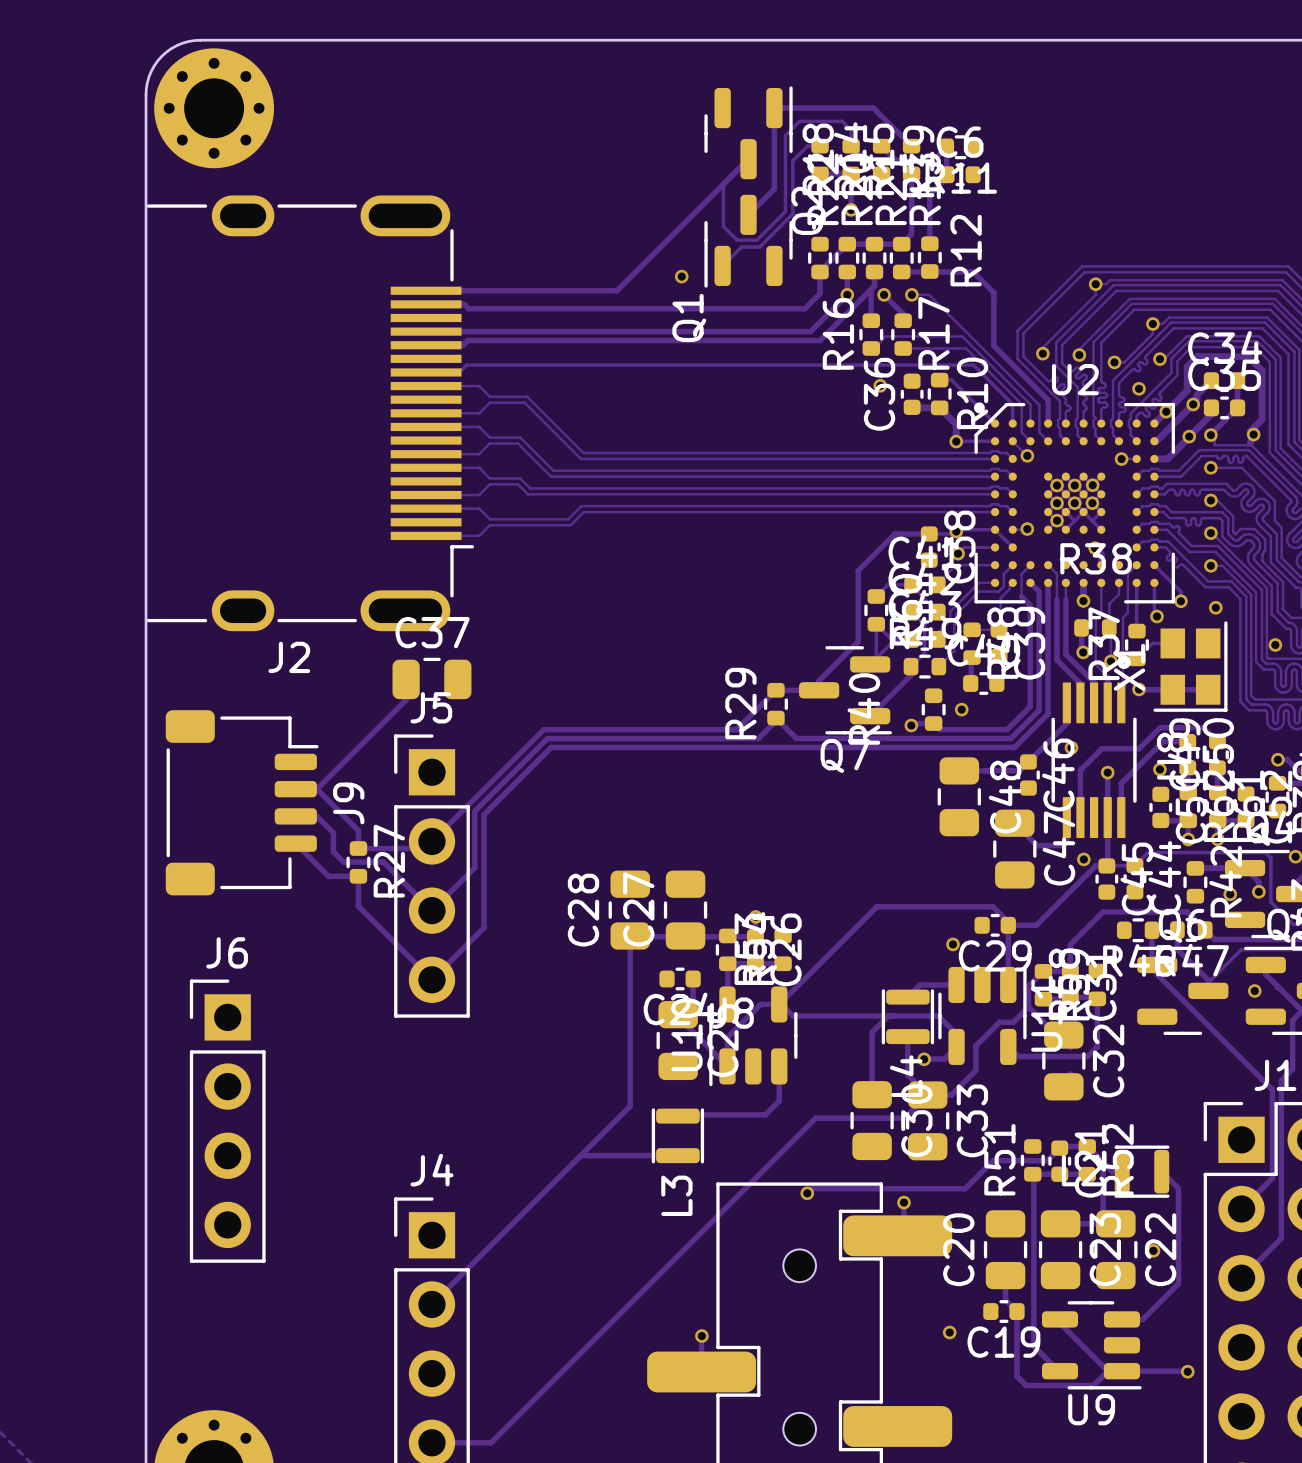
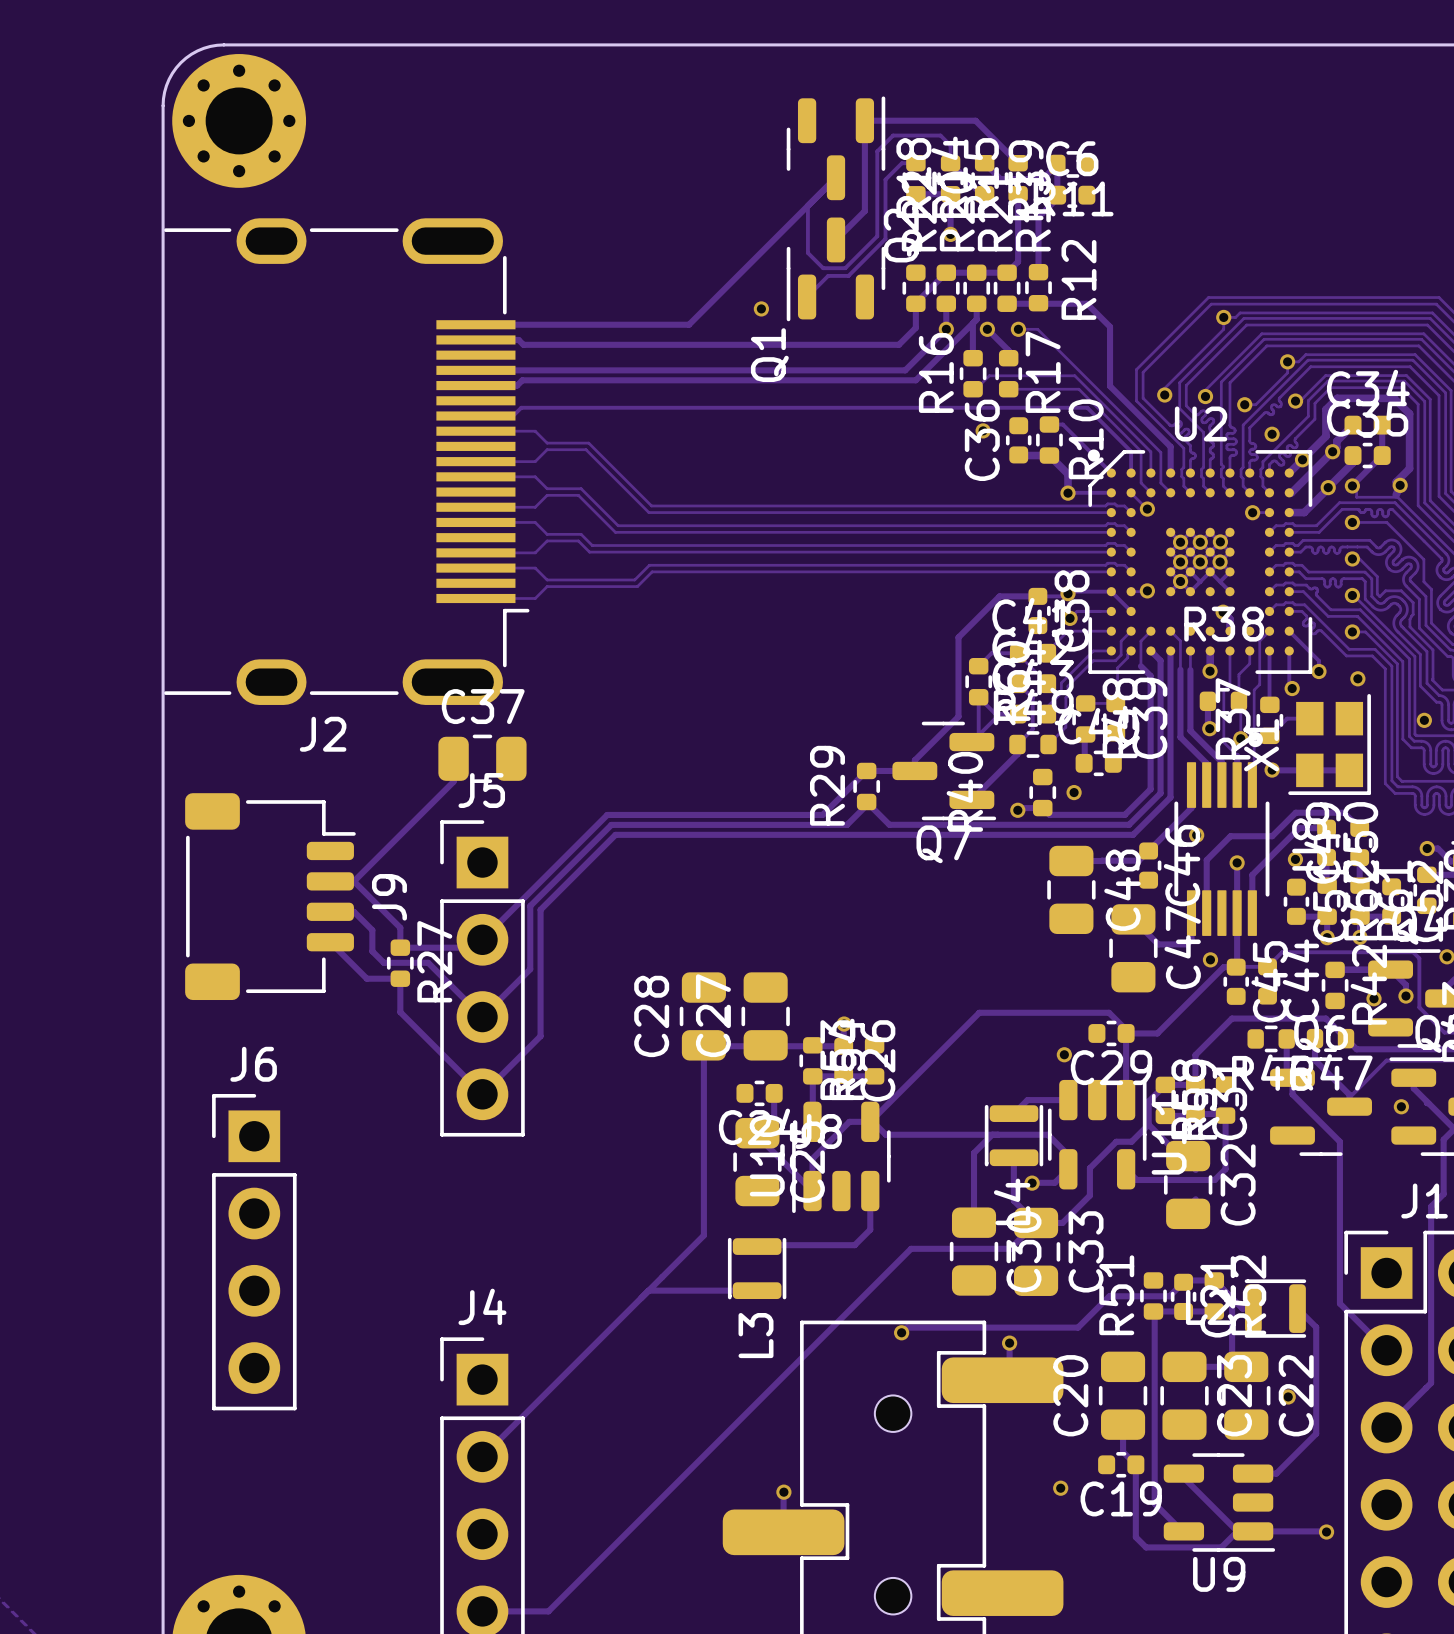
track: (1157, 974) (1272, 1089) (1272, 1178) (1241, 1208) -> (1292, 1088) (1292, 1094) (1339, 1141) (1339, 1303) (1386, 1350)

